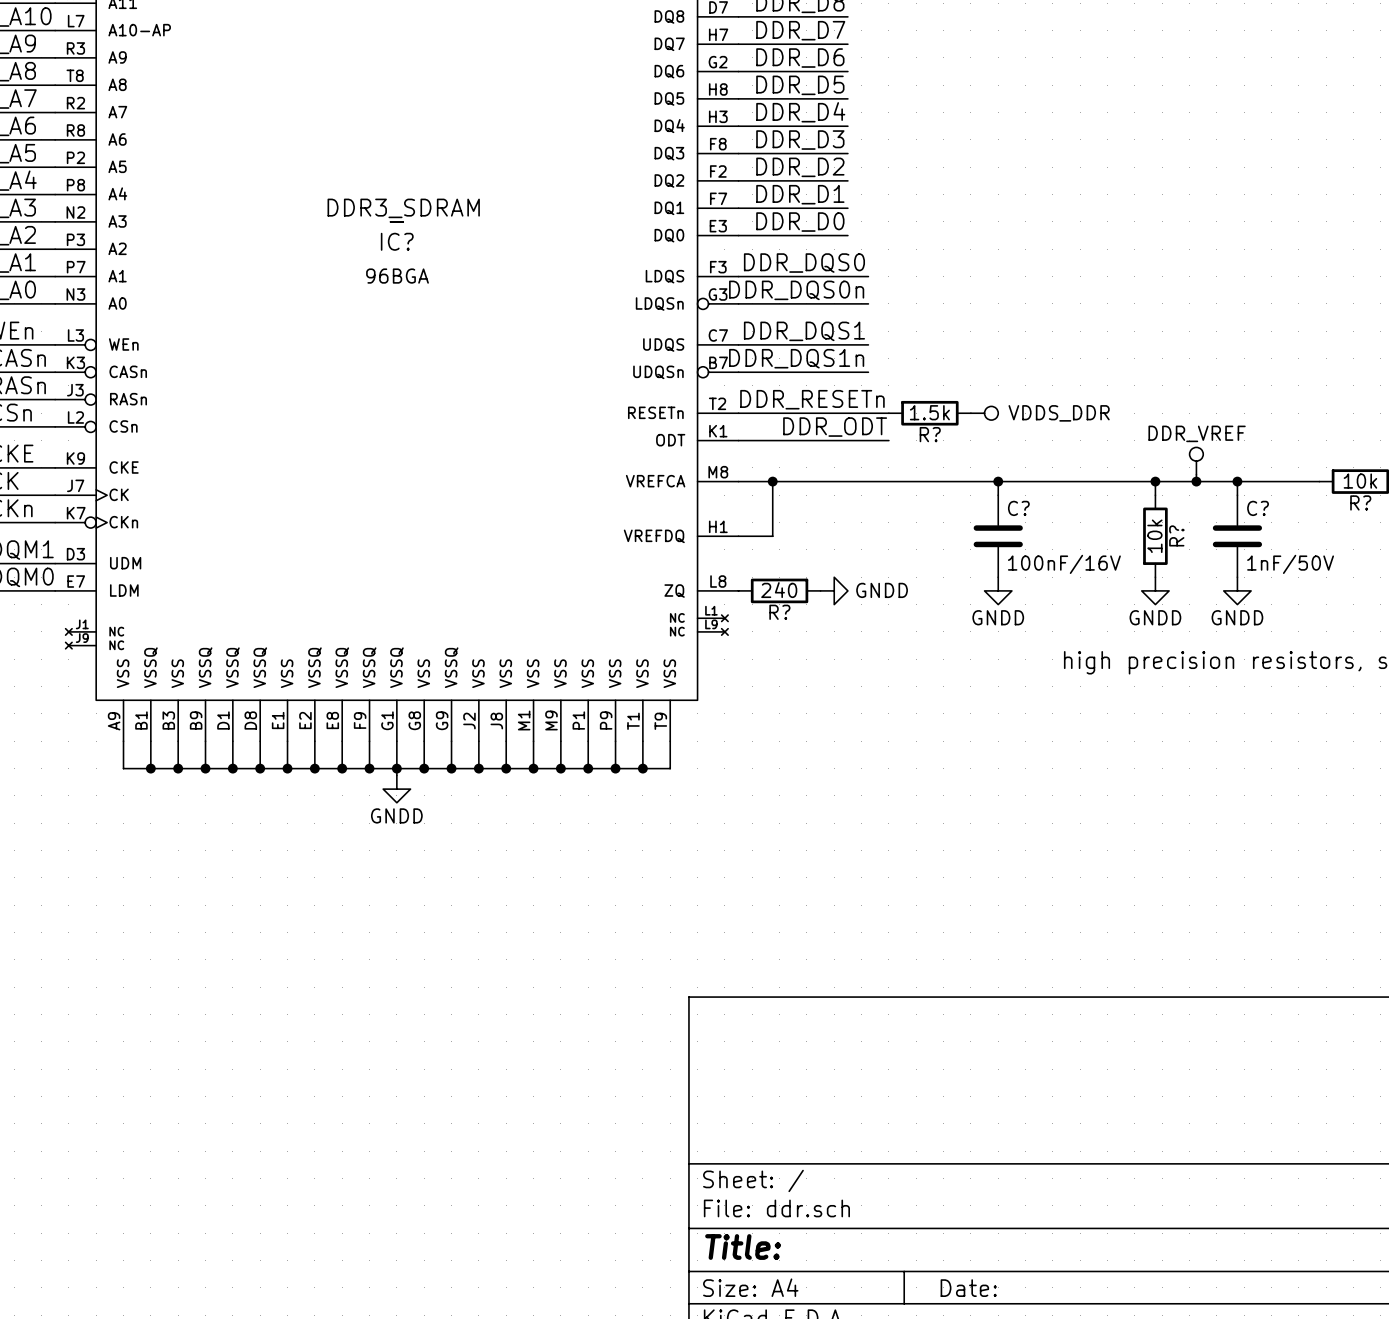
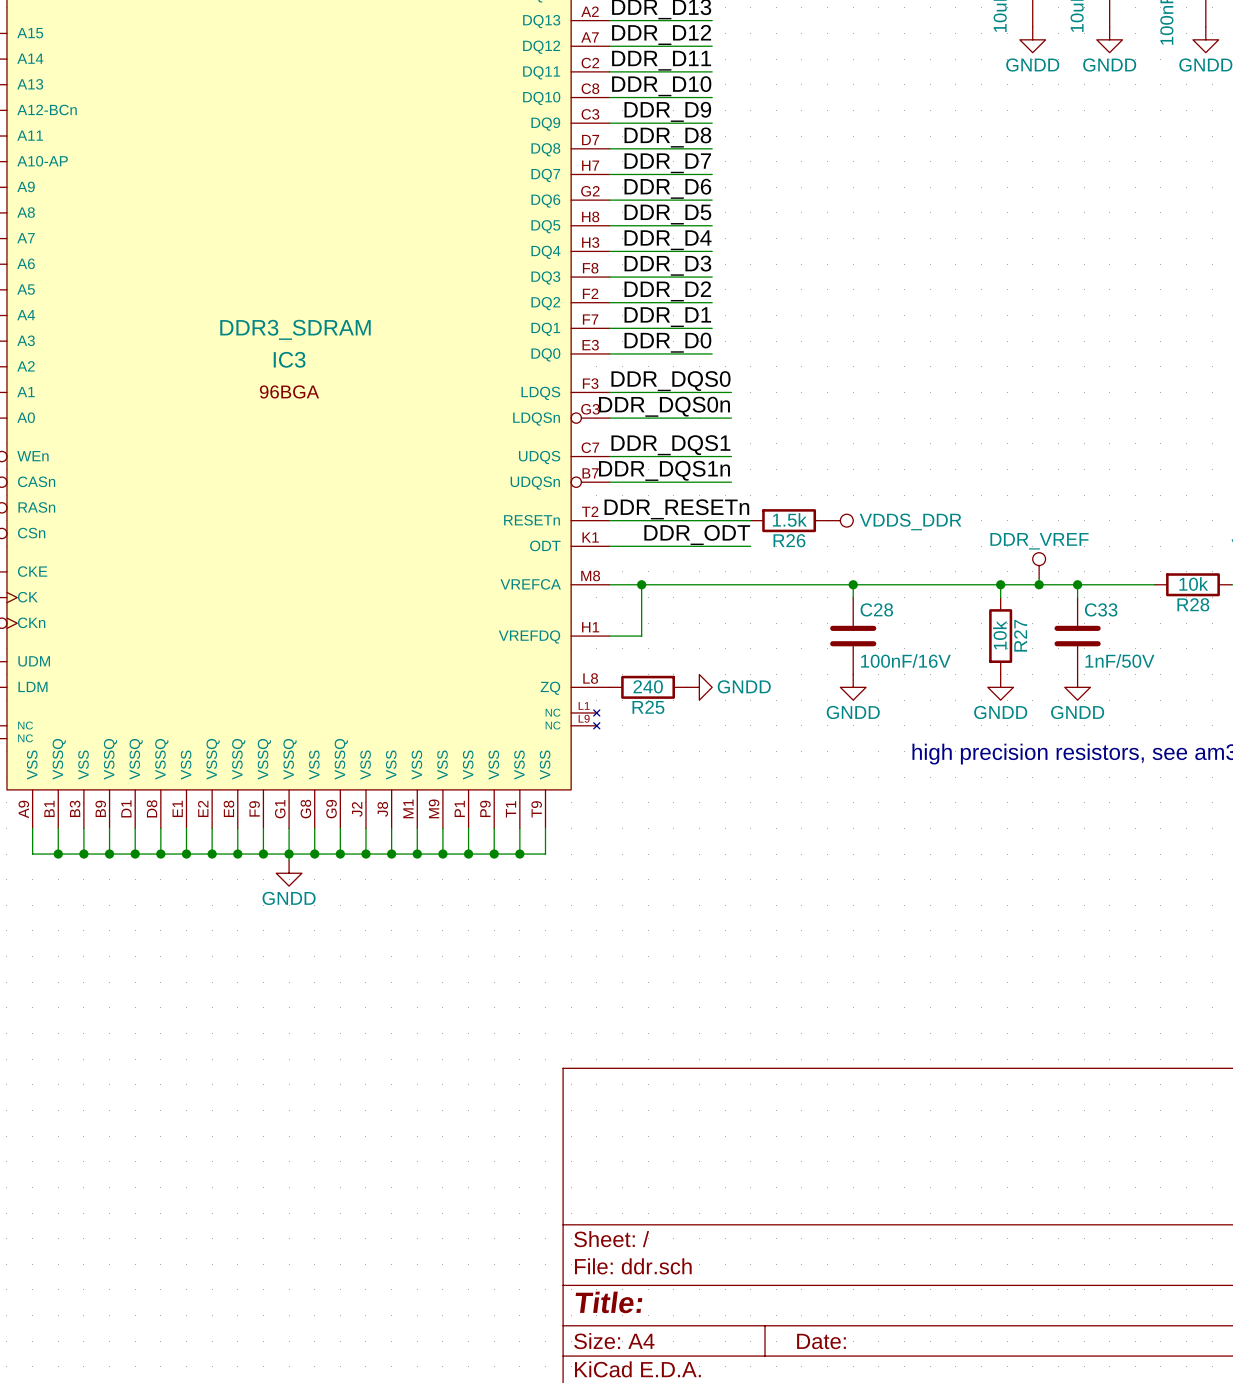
IC? name: IC? (397, 241) -> IC3 (289, 359)
R? name: R? (930, 434) -> R26 (789, 540)
R? name: R? (1360, 502) -> R28 (1193, 604)
C? name: C? (1018, 508) -> C28 (876, 609)
C? name: C? (1258, 508) -> C33 (1101, 609)
R? name: R? (1176, 535) -> R27 (1020, 635)
R? name: R? (779, 612) -> R25 (648, 707)

